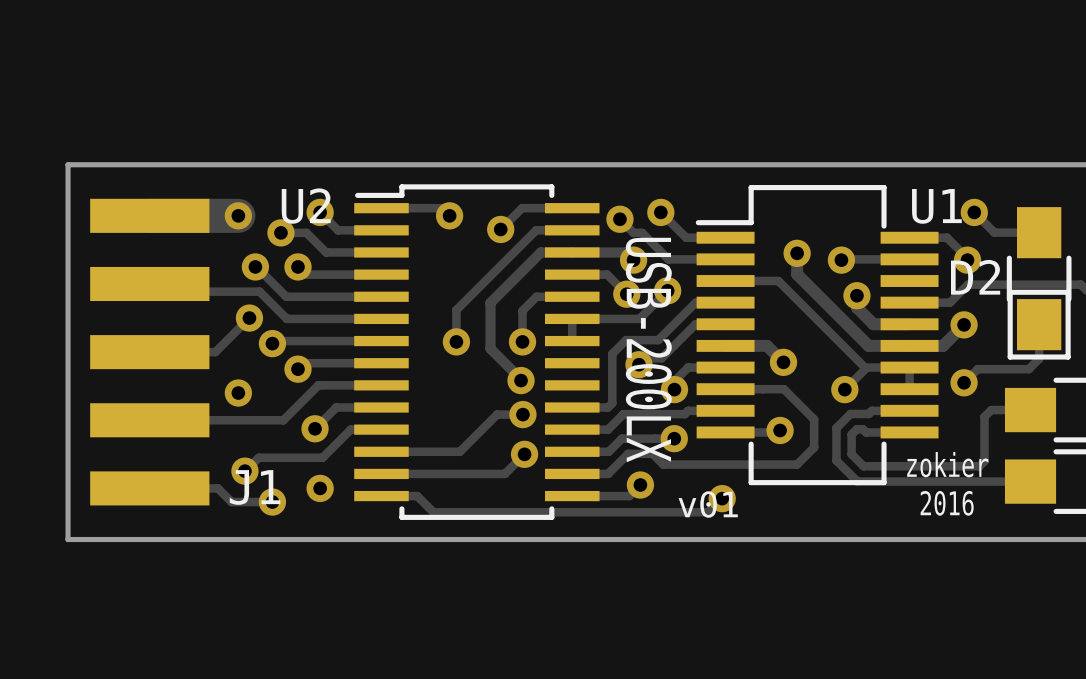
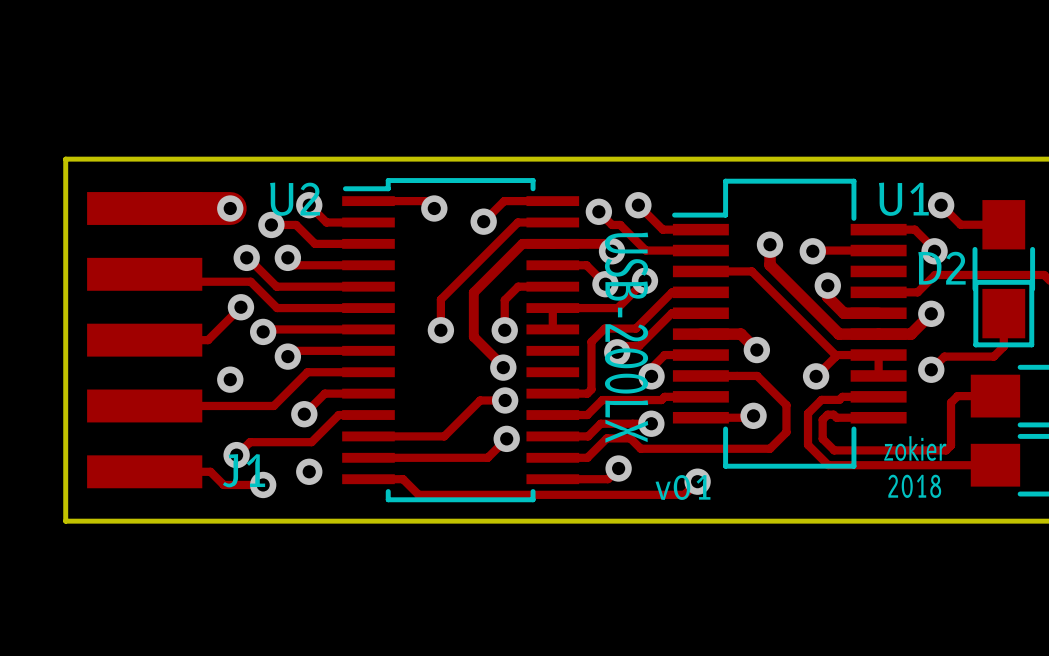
text: 2016 (947, 503) -> 2018 (914, 486)

